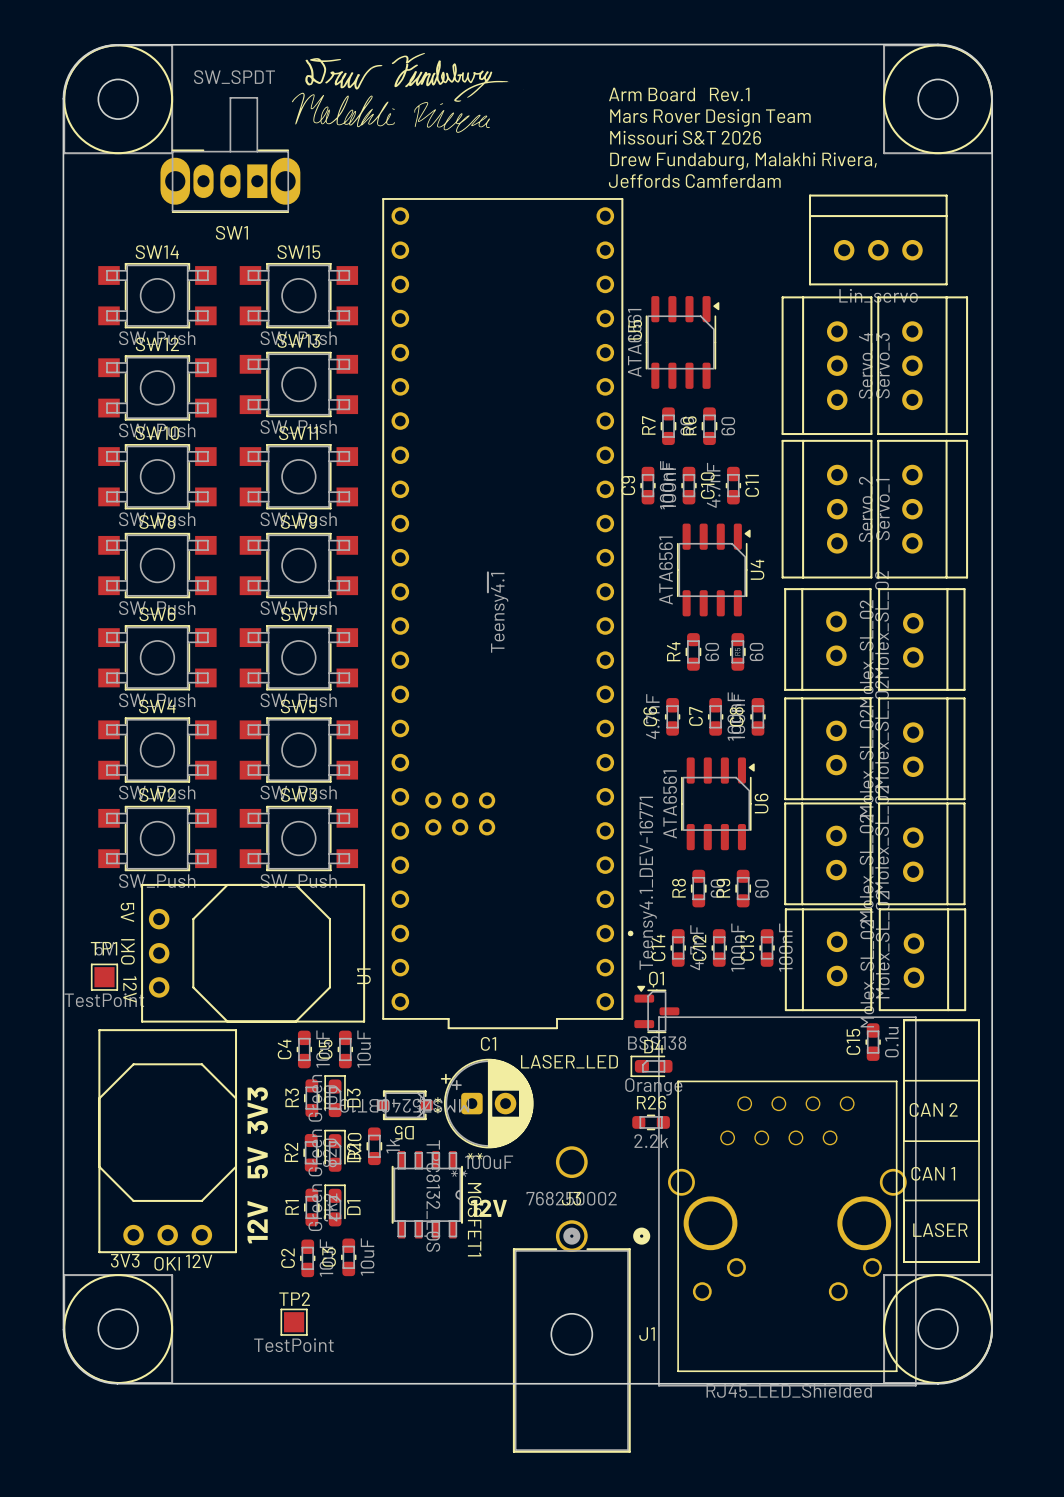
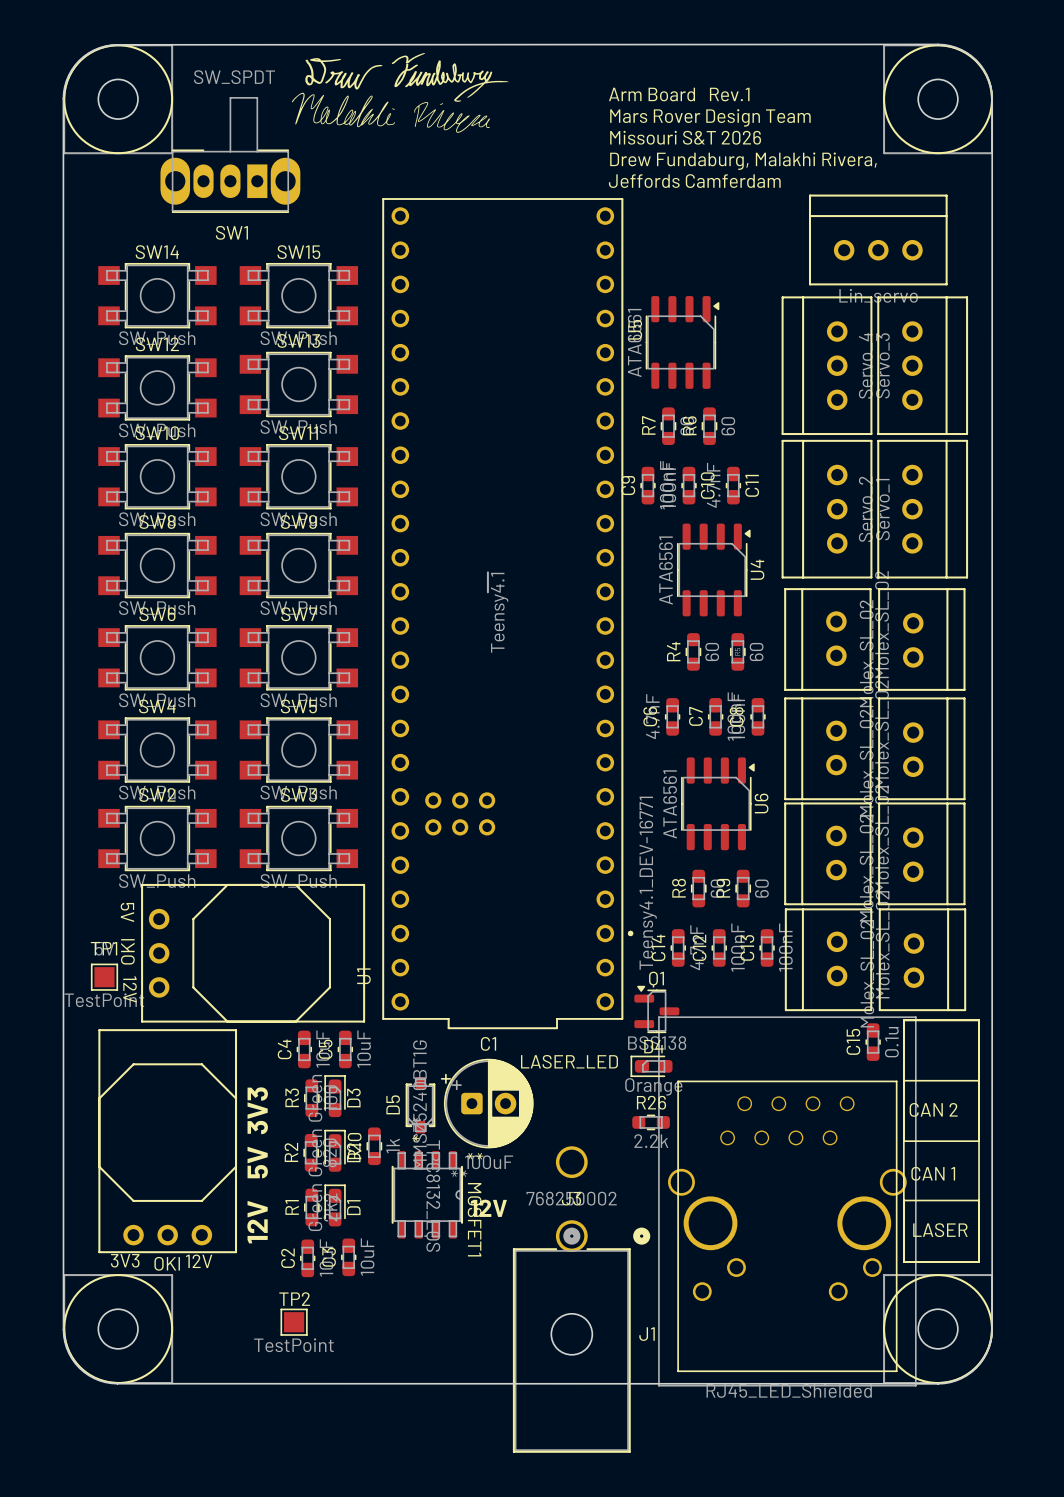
D5 rotation: 0° (404, 1105) -> 90° clockwise (420, 1105)

